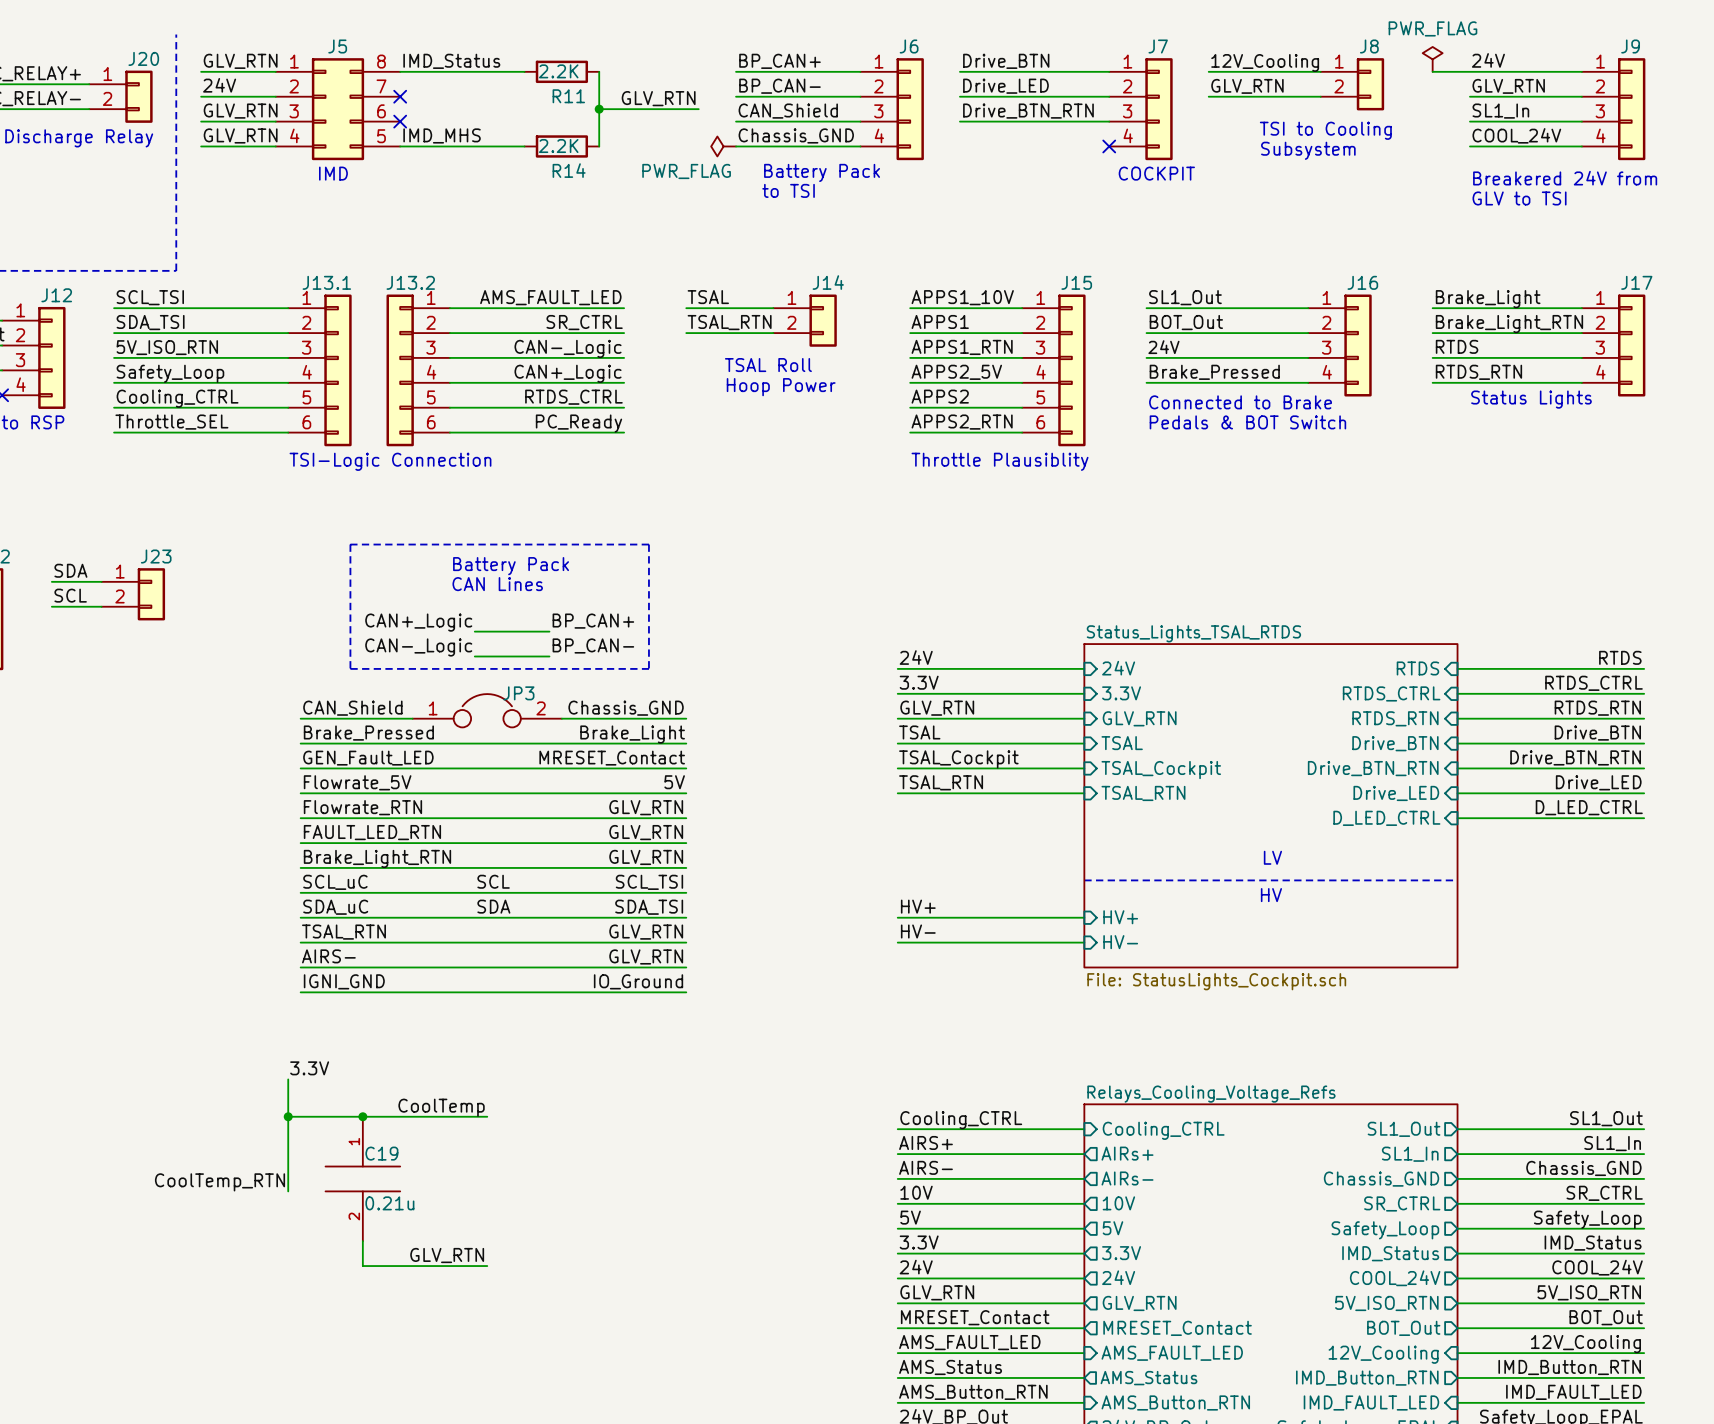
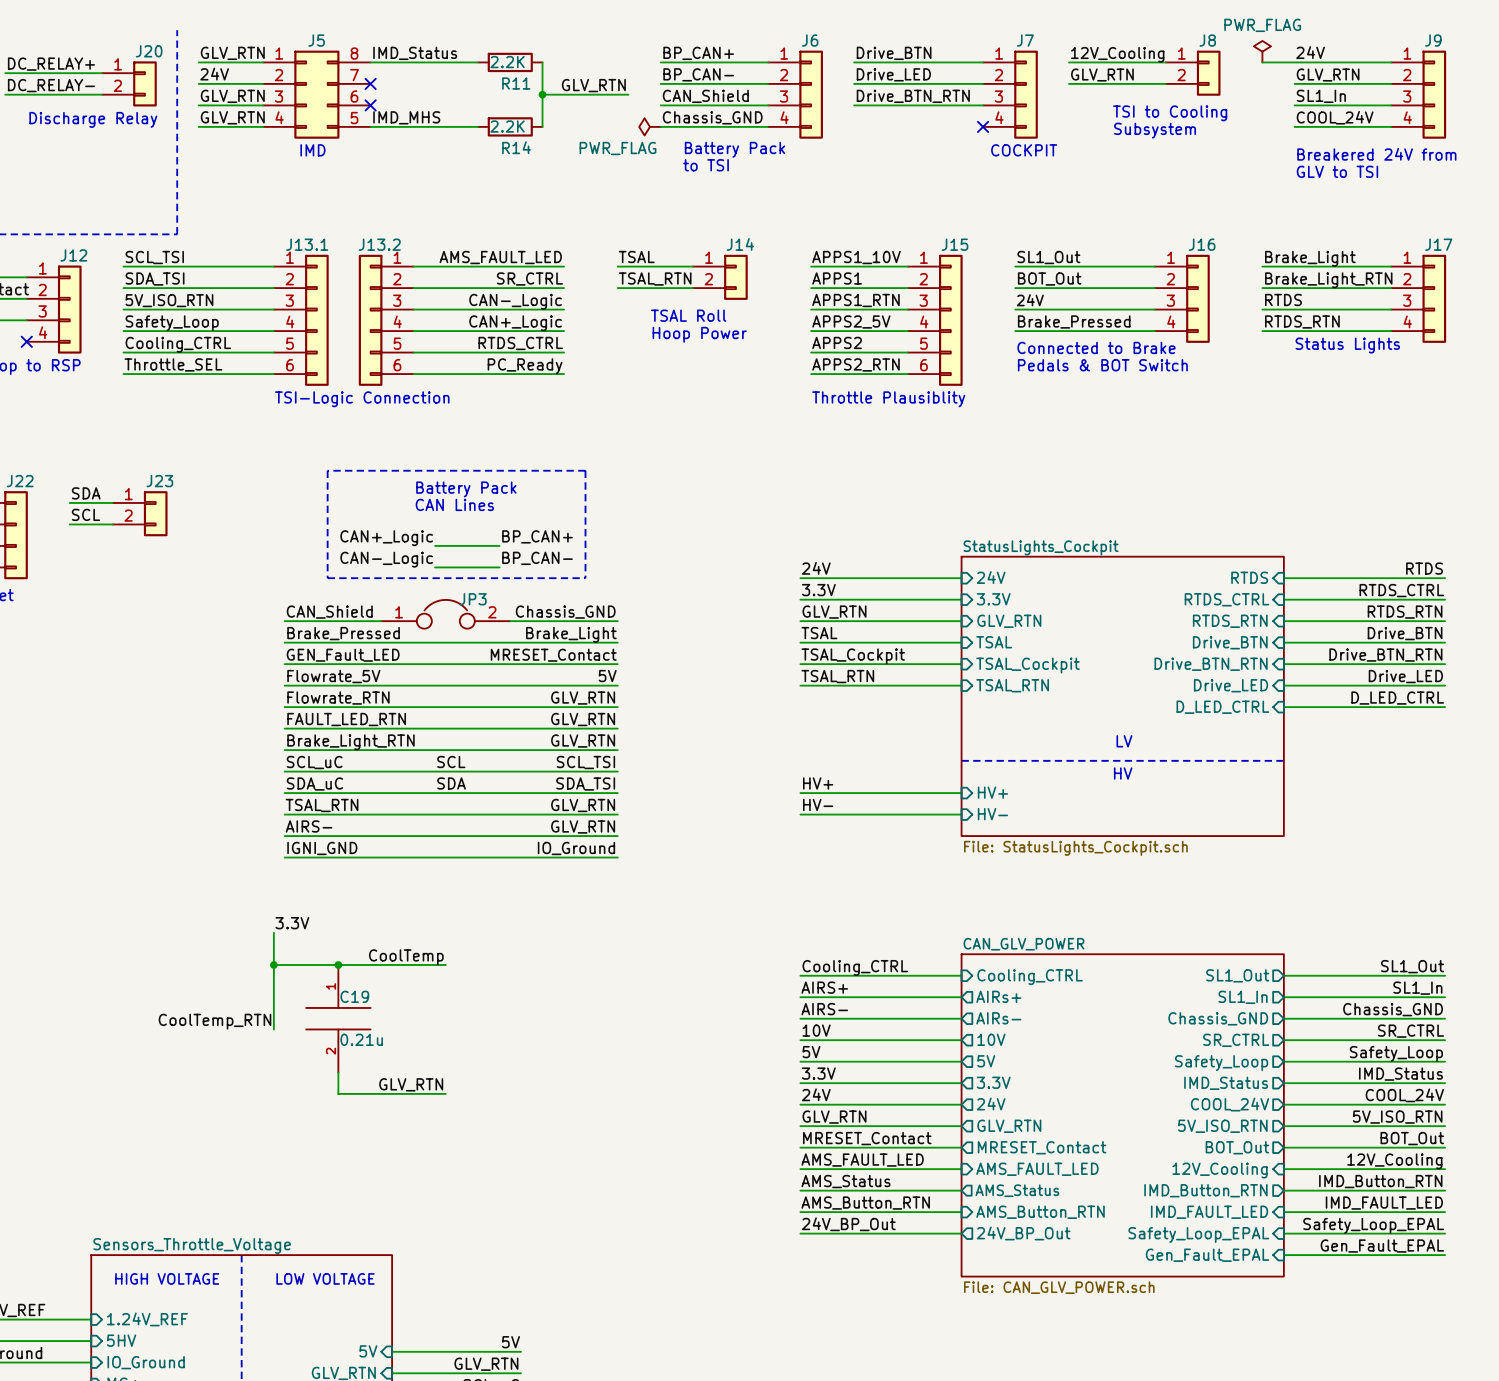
sheet Status_Lights_TSAL_RTDS name: Status_Lights_TSAL_RTDS (1193, 633) -> StatusLights_Cockpit (1041, 547)
sheet Relays_Cooling_Voltage_Refs name: Relays_Cooling_Voltage_Refs (1211, 1094) -> CAN_GLV_POWER (1023, 944)

